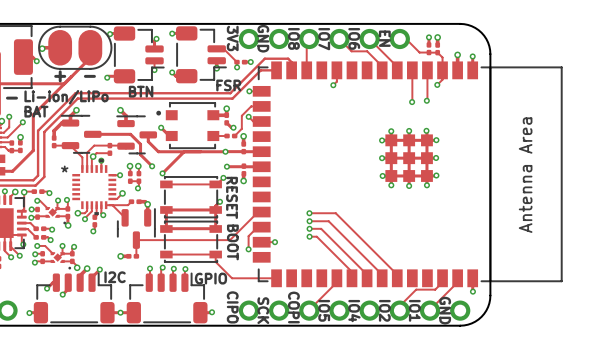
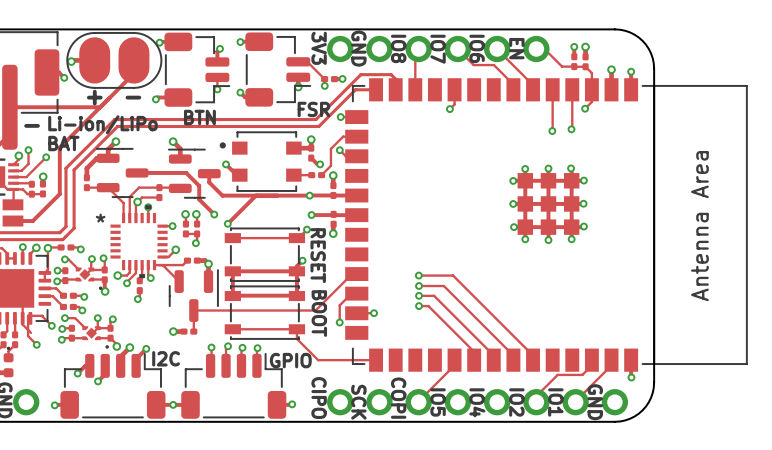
track: (23, 244) (21, 234) (10, 234) (10, 246) (19, 255) -> none
via: (23, 244) -> none
track: none -> (51, 325) (42, 315) (28, 315) (28, 336) (36, 344)
via: none -> (51, 325)
via: (19, 255) -> none
via: (11, 257) -> none
via: none -> (36, 344)

